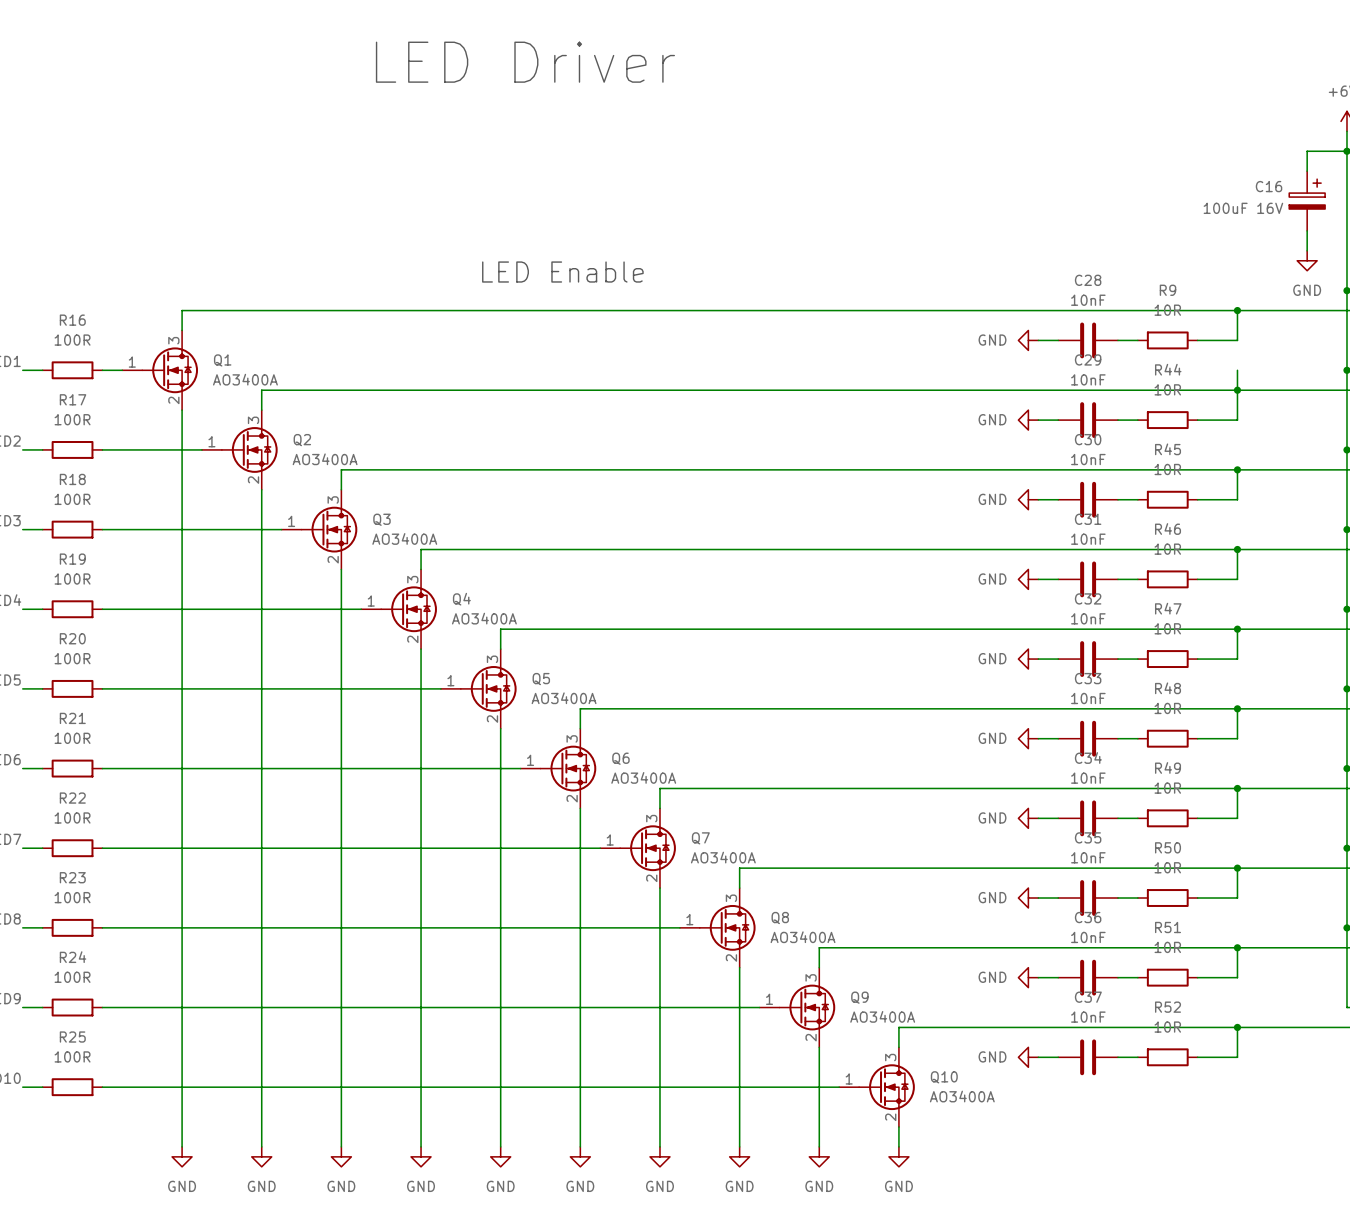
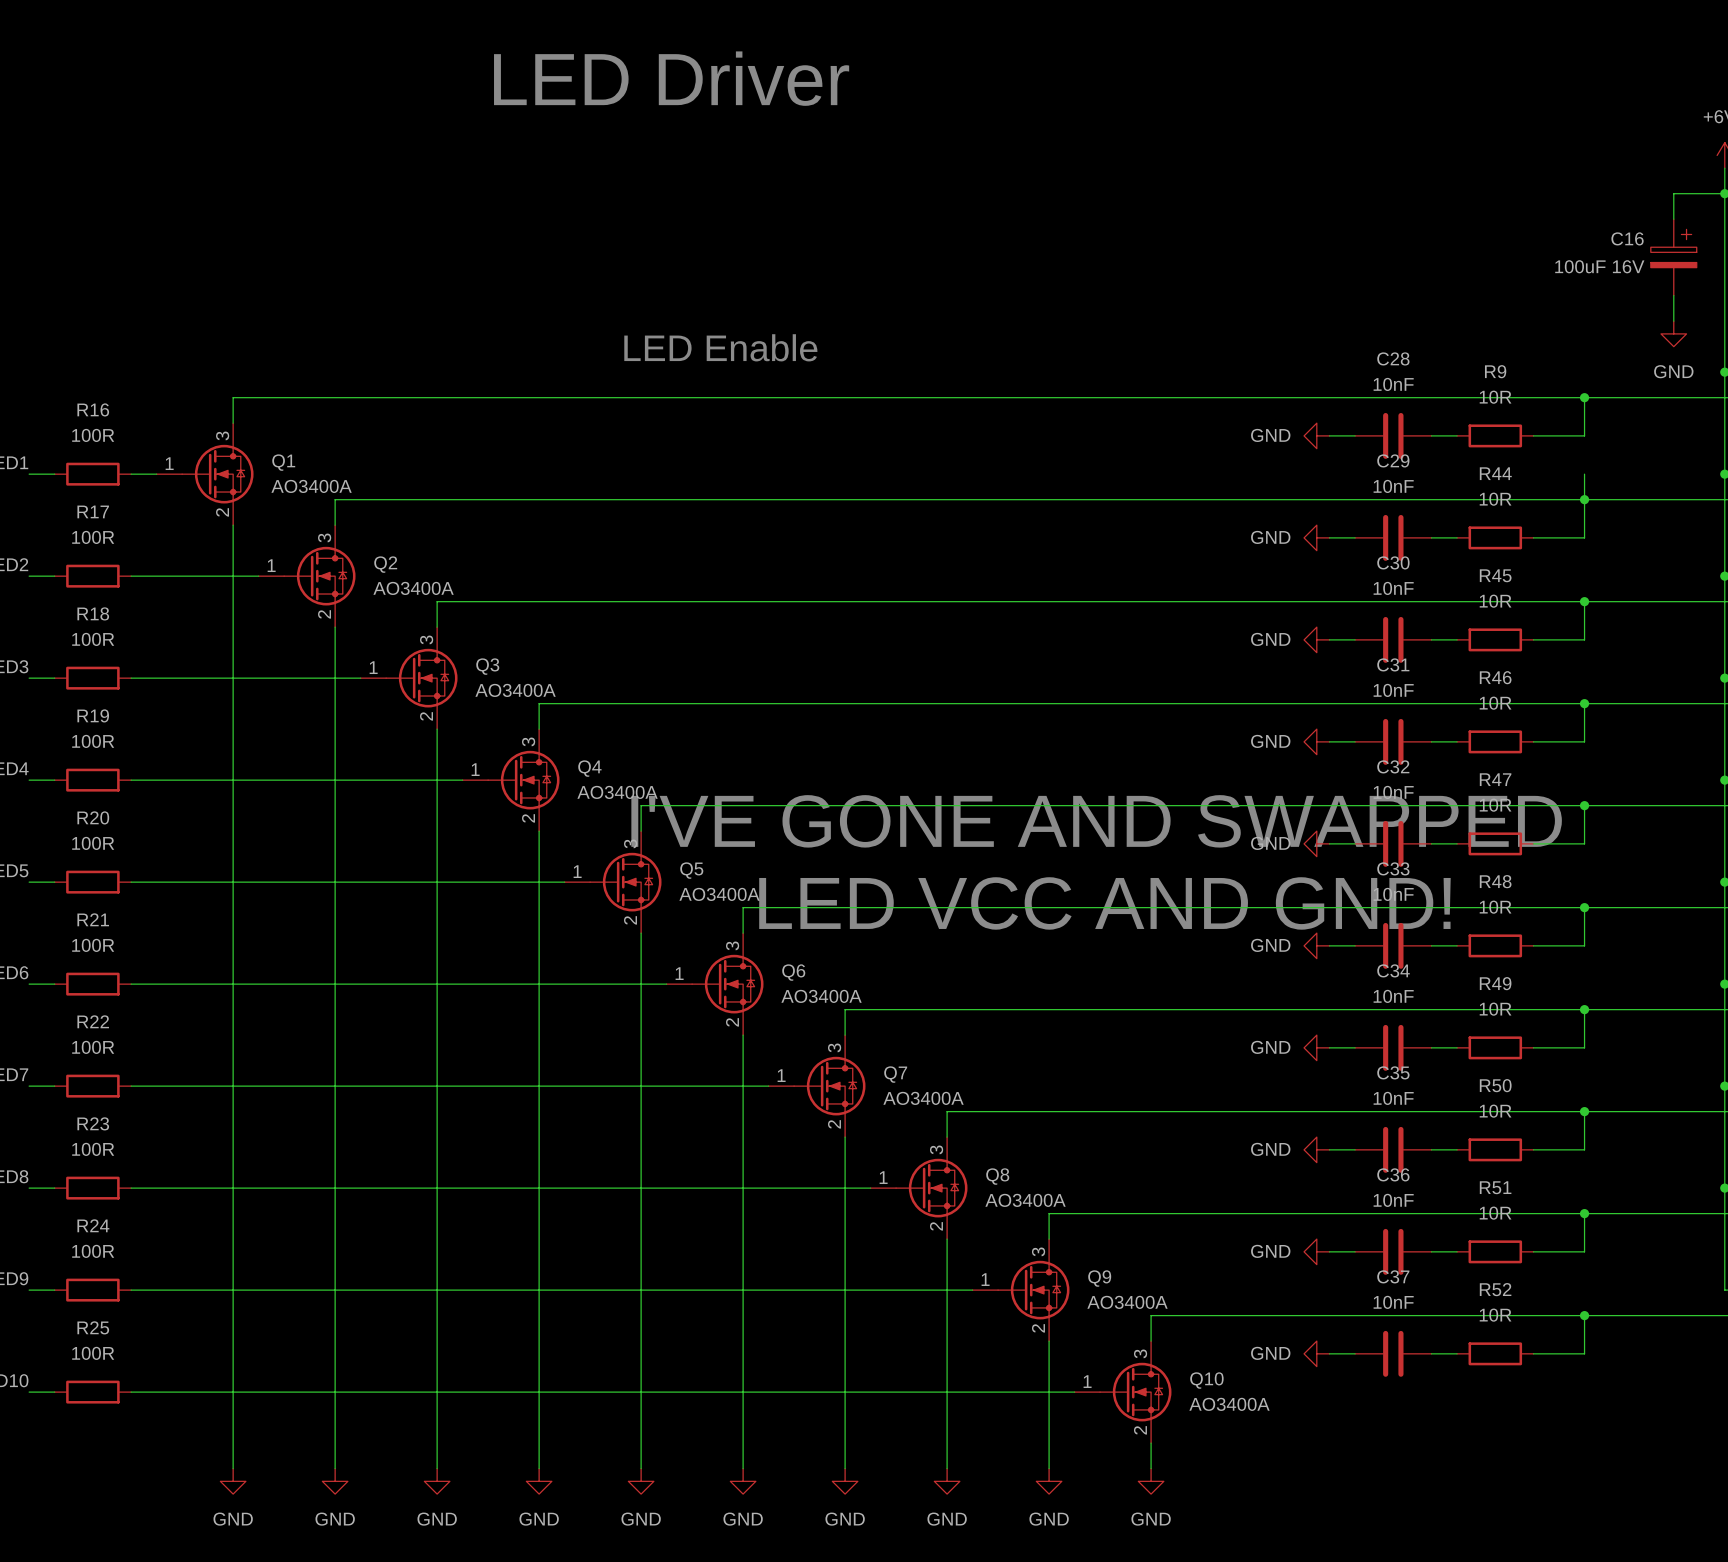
text: none -> I'VE GONE AND SWAPPED (1096, 821)
text: none -> LED VCC AND GND! (1104, 903)

